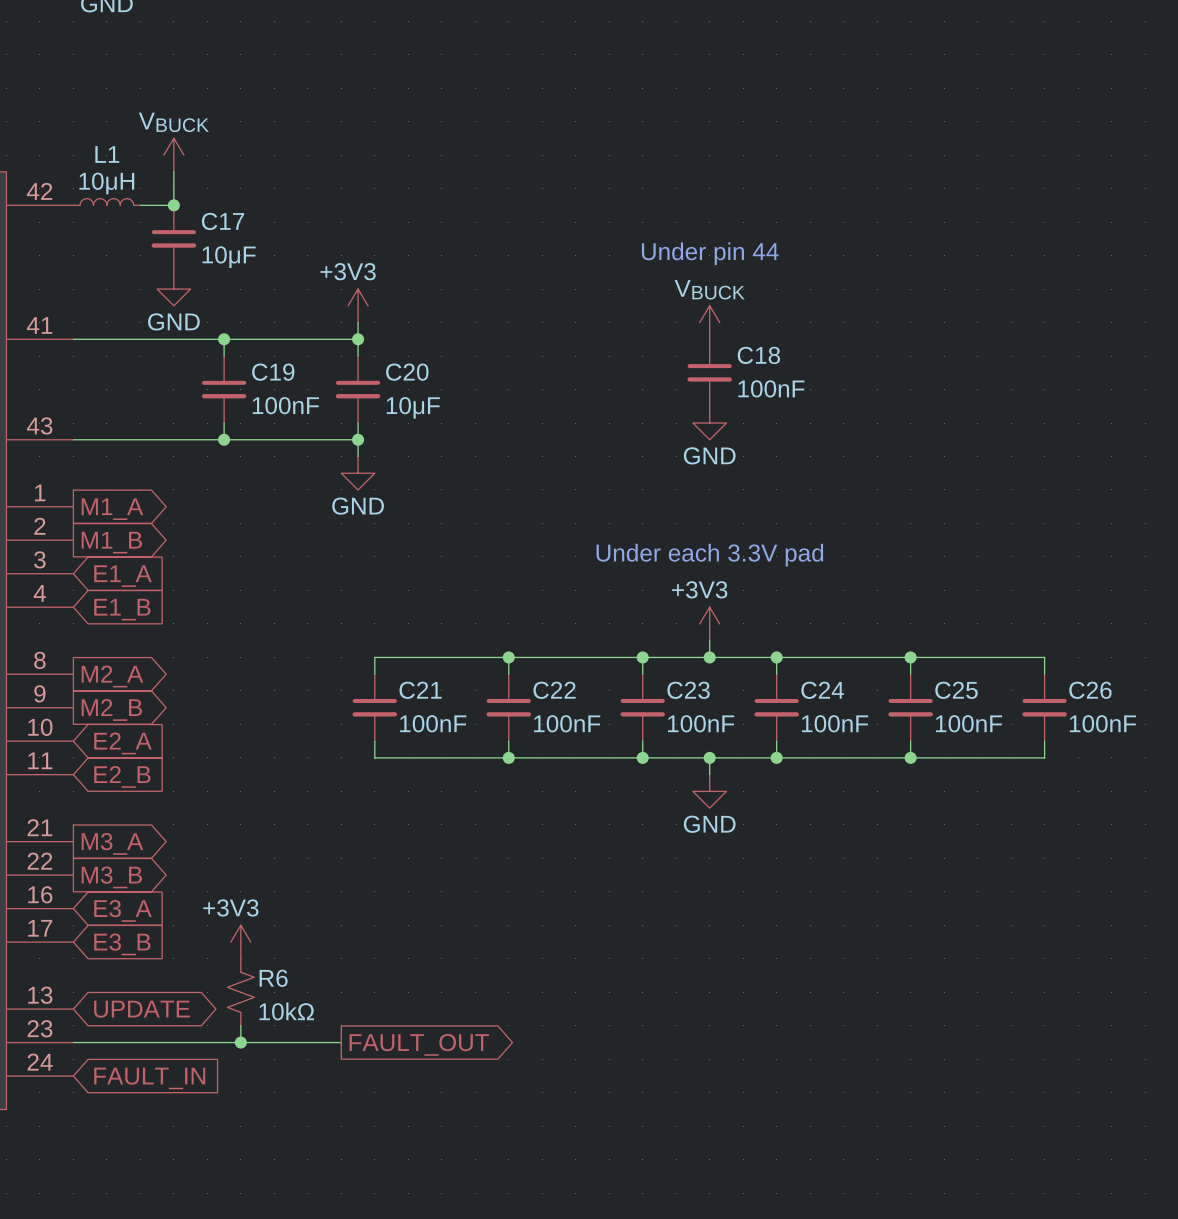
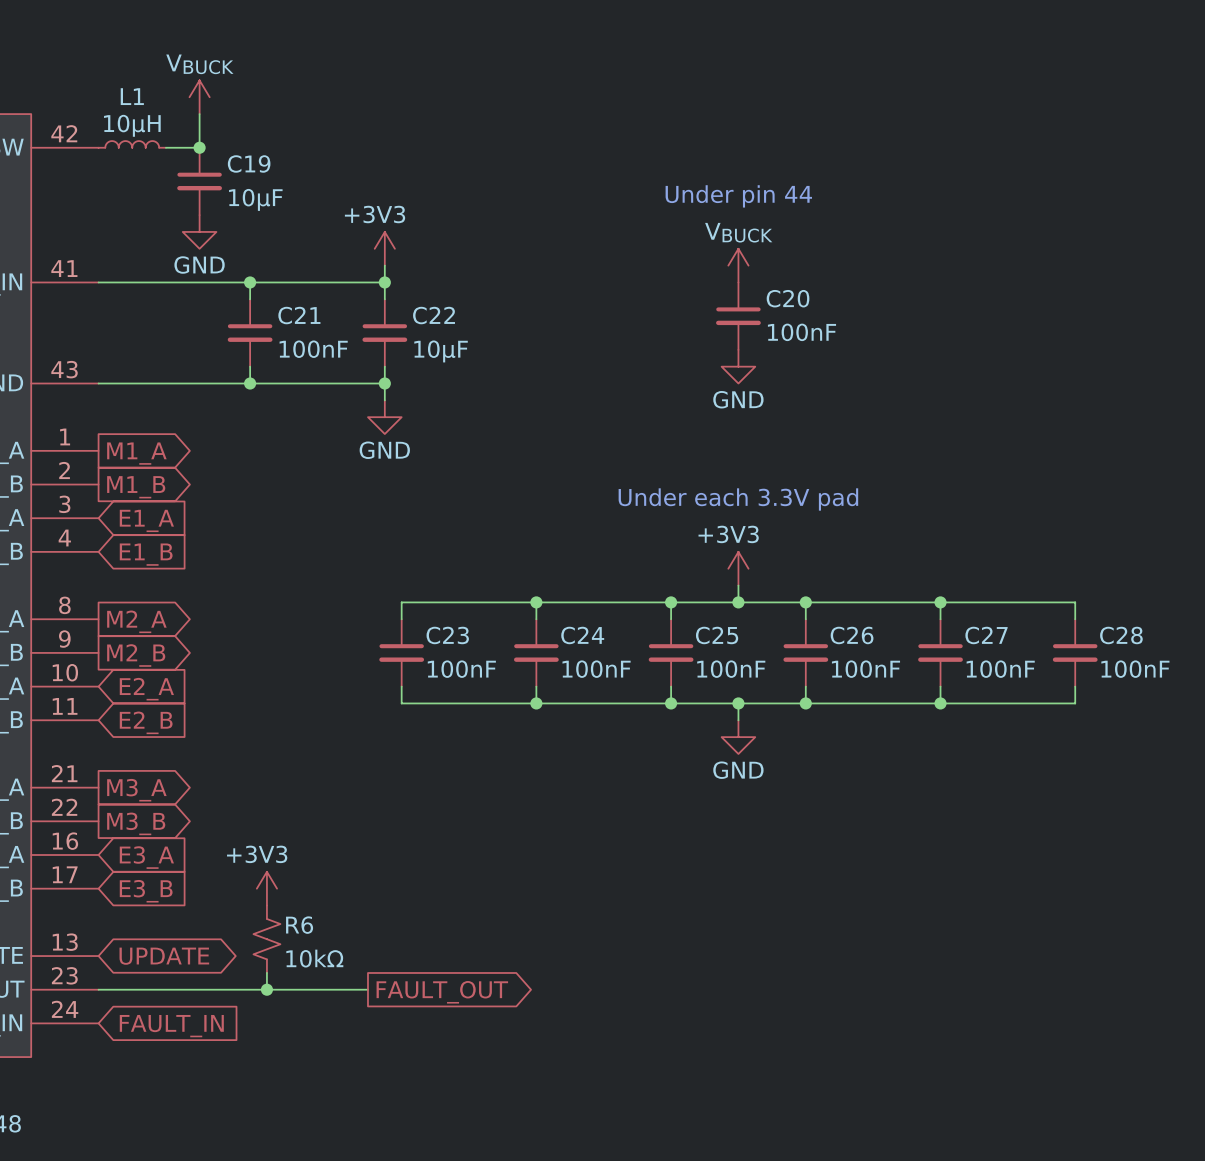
C17 name: C17 (222, 221) -> C19 (249, 163)
C18 name: C18 (758, 355) -> C20 (788, 298)
C19 name: C19 (273, 372) -> C21 (299, 315)
C20 name: C20 (407, 372) -> C22 (434, 315)
C21 name: C21 (420, 690) -> C23 (447, 635)
C22 name: C22 (554, 690) -> C24 (582, 635)
C23 name: C23 (688, 690) -> C25 (717, 635)
C24 name: C24 (822, 690) -> C26 (852, 635)
C25 name: C25 (956, 690) -> C27 (986, 635)
C26 name: C26 (1090, 690) -> C28 (1121, 635)

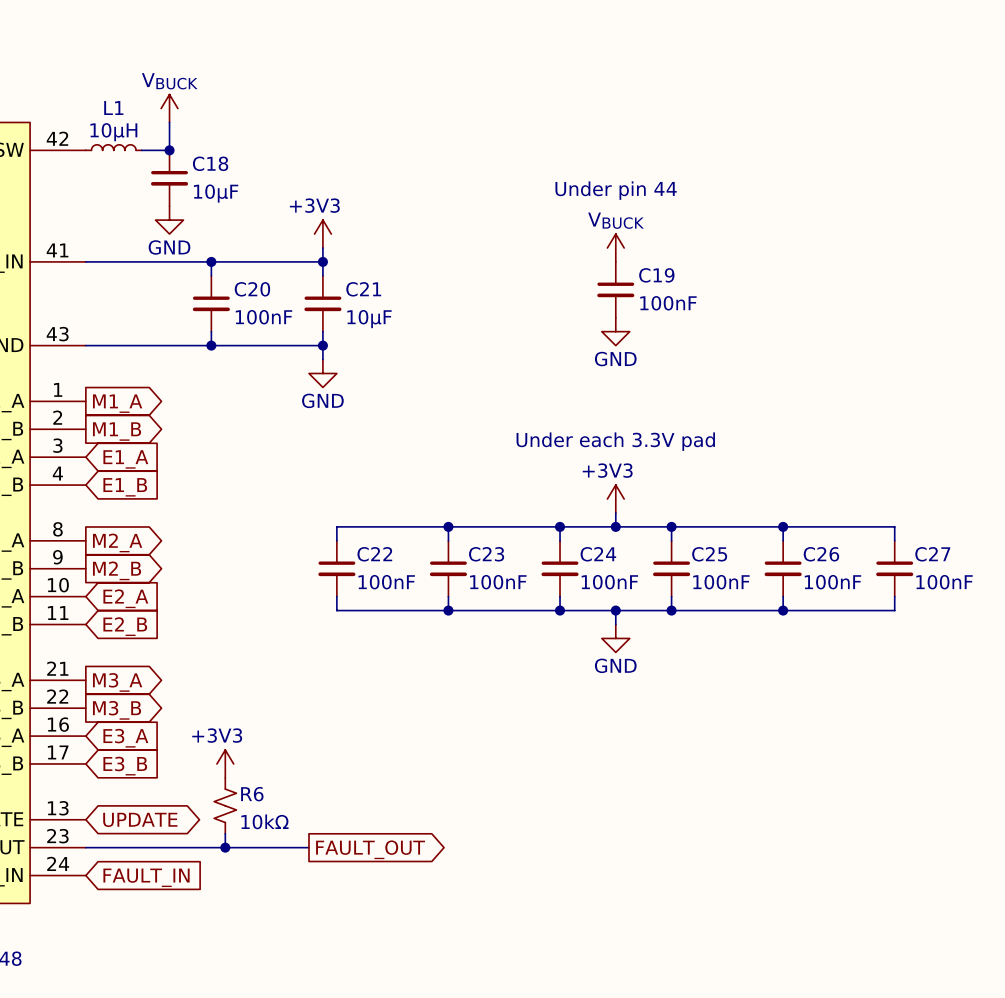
C19 name: C19 (249, 163) -> C18 (210, 163)
C20 name: C20 (788, 298) -> C19 (656, 275)
C21 name: C21 (299, 315) -> C20 (252, 289)
C22 name: C22 (434, 315) -> C21 (363, 289)
C23 name: C23 (447, 635) -> C22 (374, 554)
C24 name: C24 (582, 635) -> C23 (486, 554)
C25 name: C25 (717, 635) -> C24 (598, 554)
C26 name: C26 (852, 635) -> C25 (709, 554)
C27 name: C27 (986, 635) -> C26 (821, 554)
C28 name: C28 (1121, 635) -> C27 (932, 554)

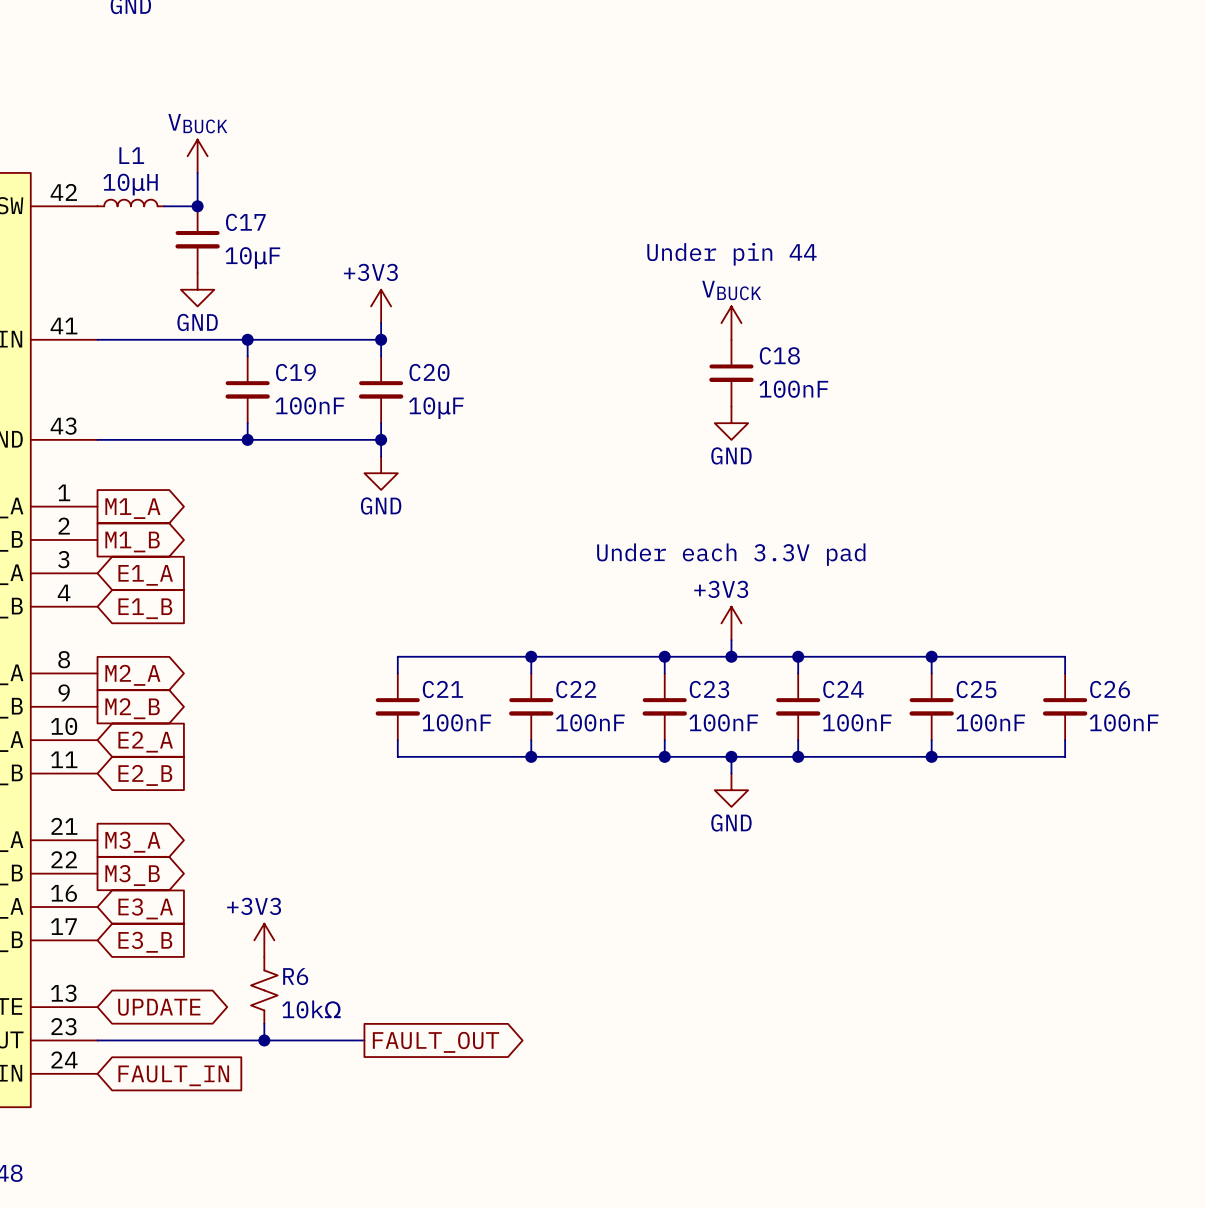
C18 name: C18 (210, 163) -> C17 (245, 222)
C19 name: C19 (656, 275) -> C18 (779, 355)
C20 name: C20 (252, 289) -> C19 (295, 372)
C21 name: C21 (363, 289) -> C20 (429, 372)
C22 name: C22 (374, 554) -> C21 (442, 689)
C23 name: C23 (486, 554) -> C22 (576, 689)
C24 name: C24 (598, 554) -> C23 (709, 689)
C25 name: C25 (709, 554) -> C24 (843, 689)
C26 name: C26 (821, 554) -> C25 (976, 689)
C27 name: C27 (932, 554) -> C26 (1110, 689)

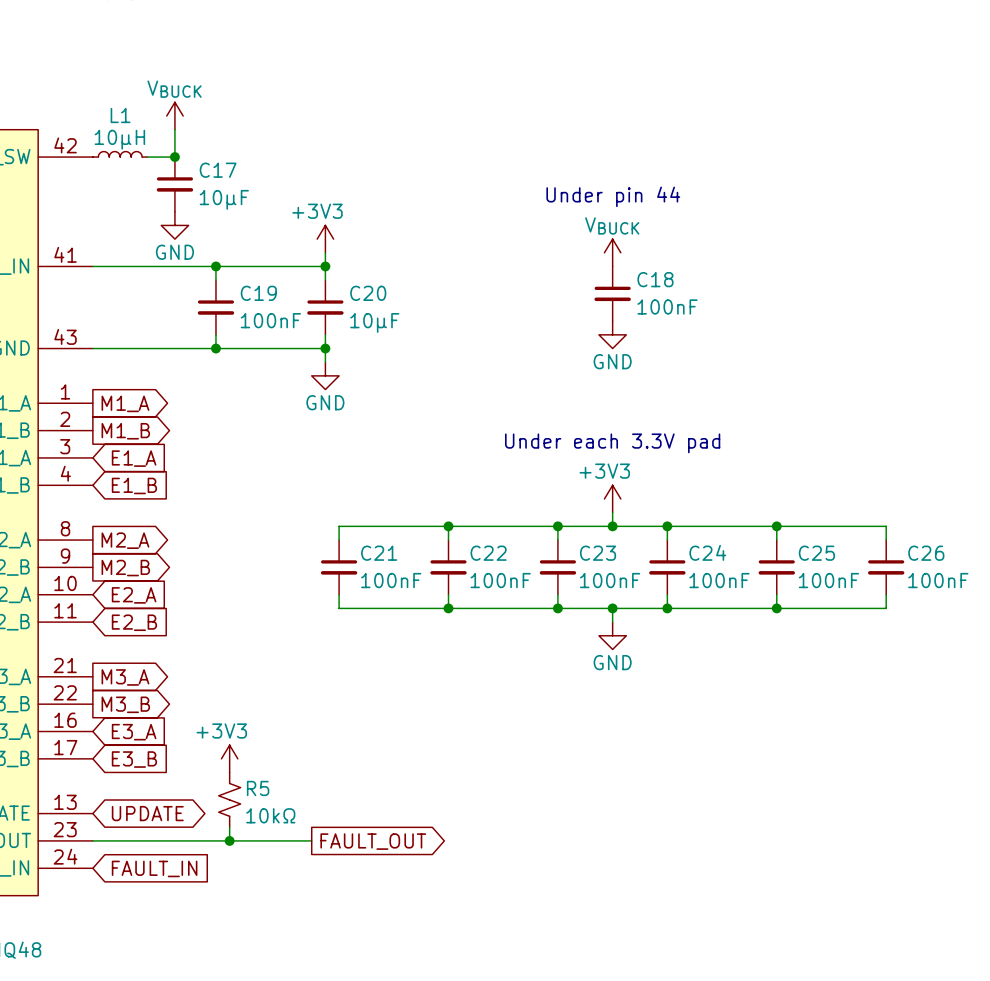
R6 name: R6 (295, 976) -> R5 (258, 788)

